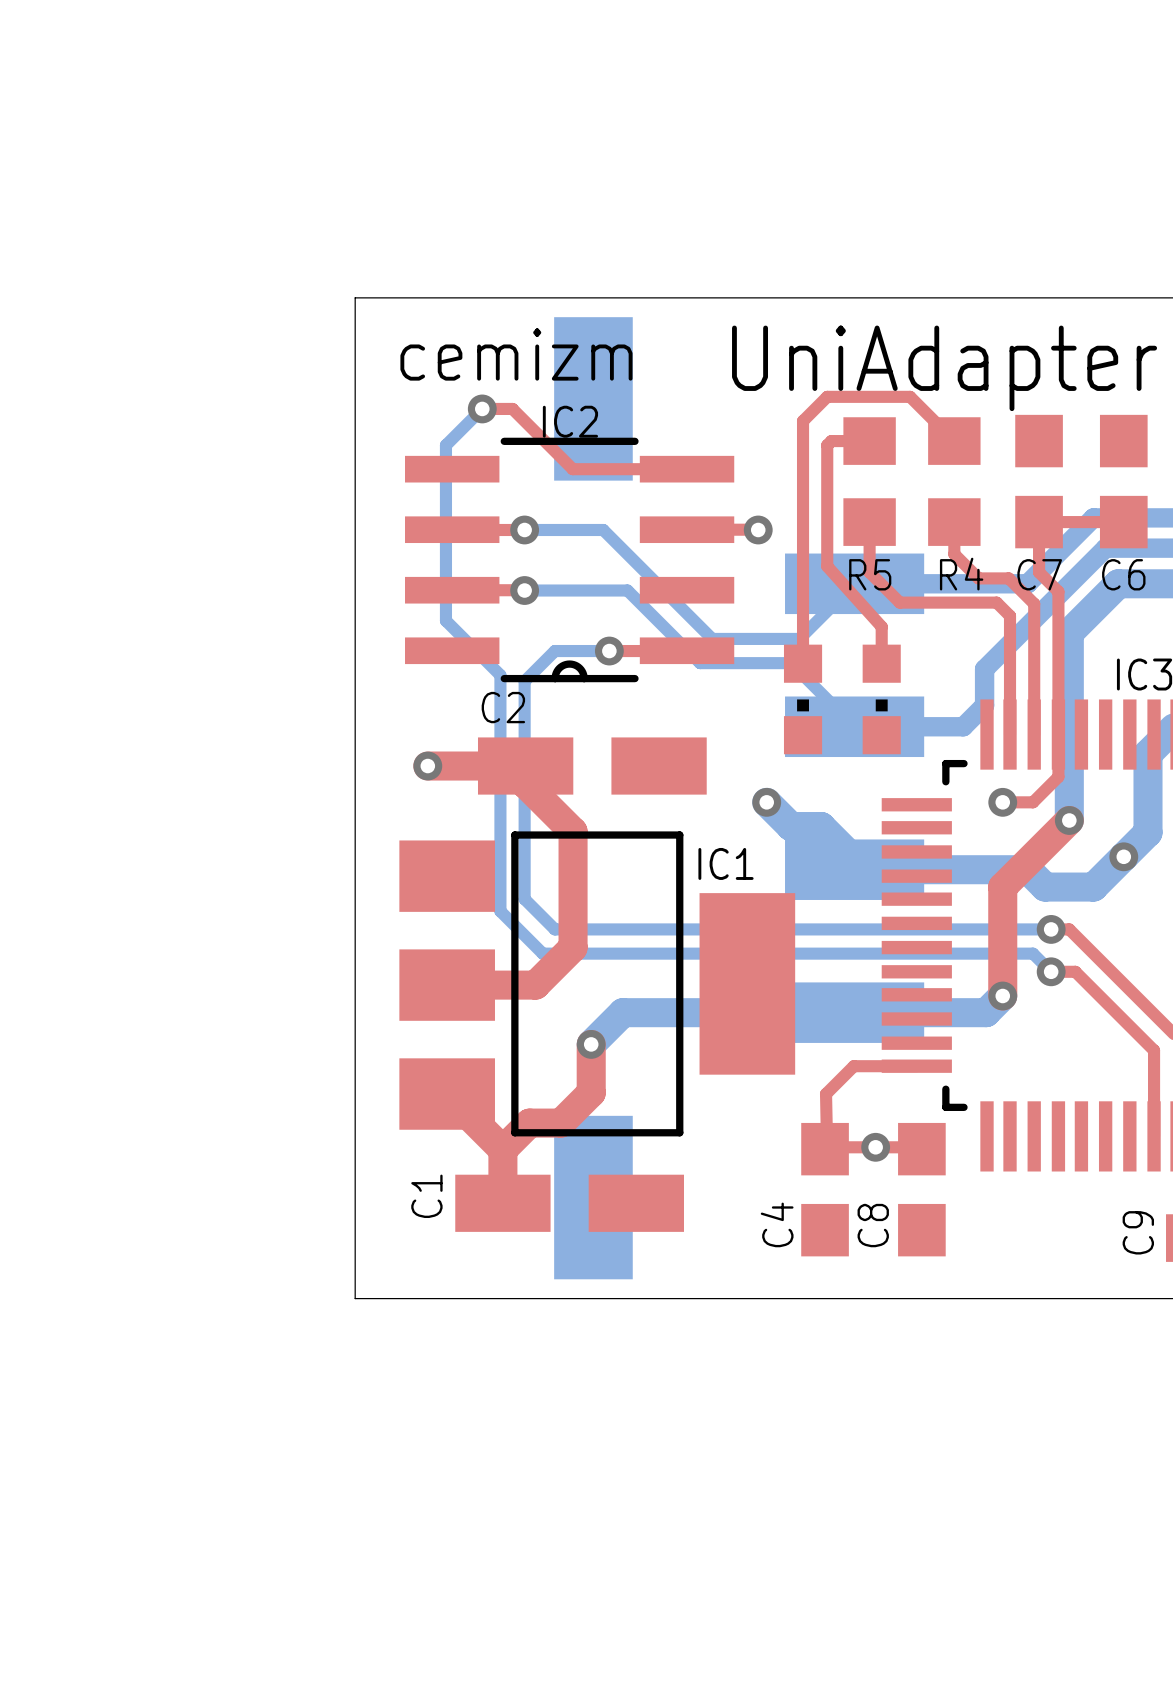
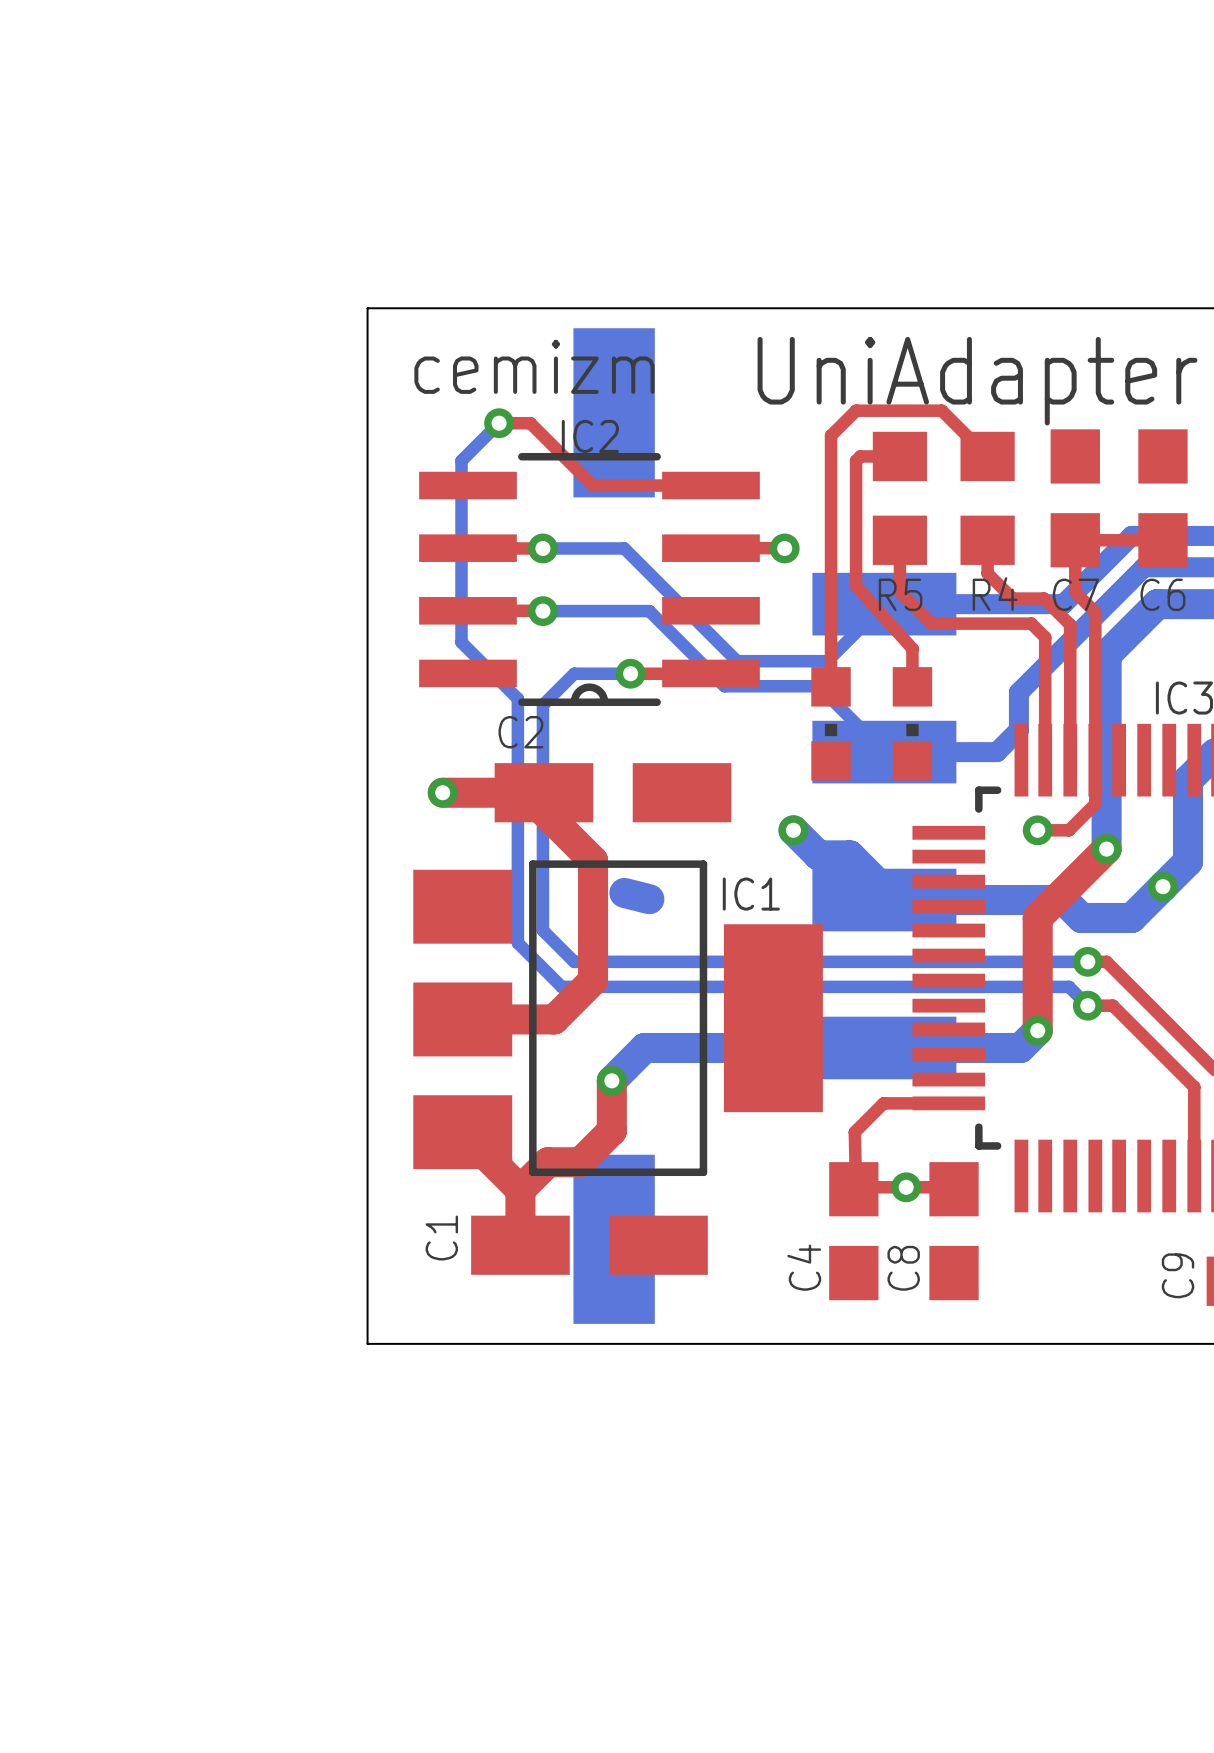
bottom track: none -> (624, 892) (649, 899)

